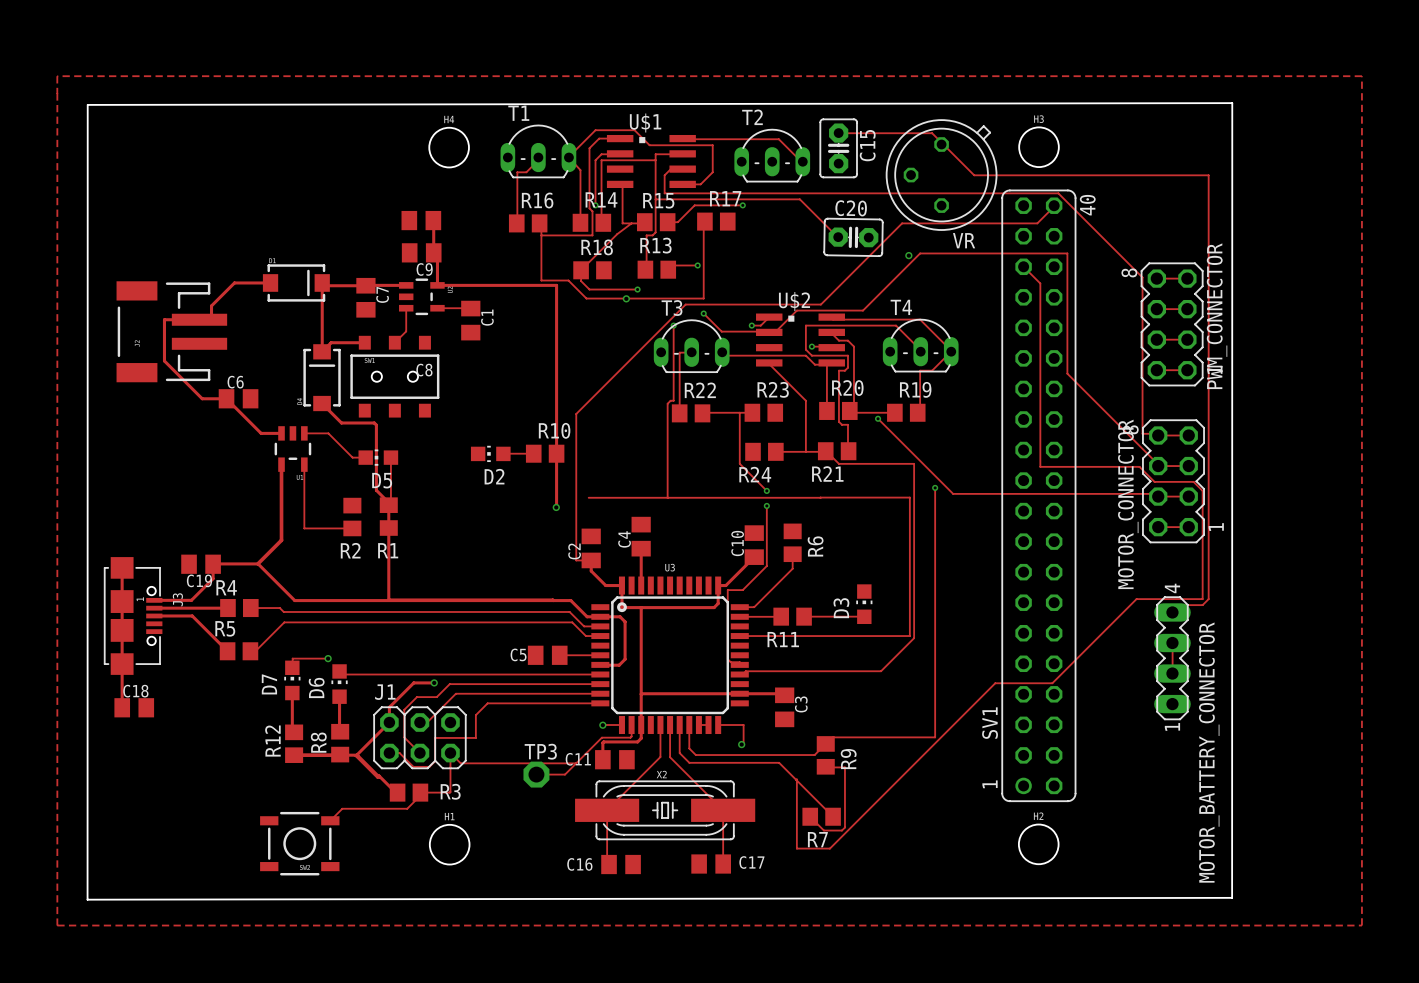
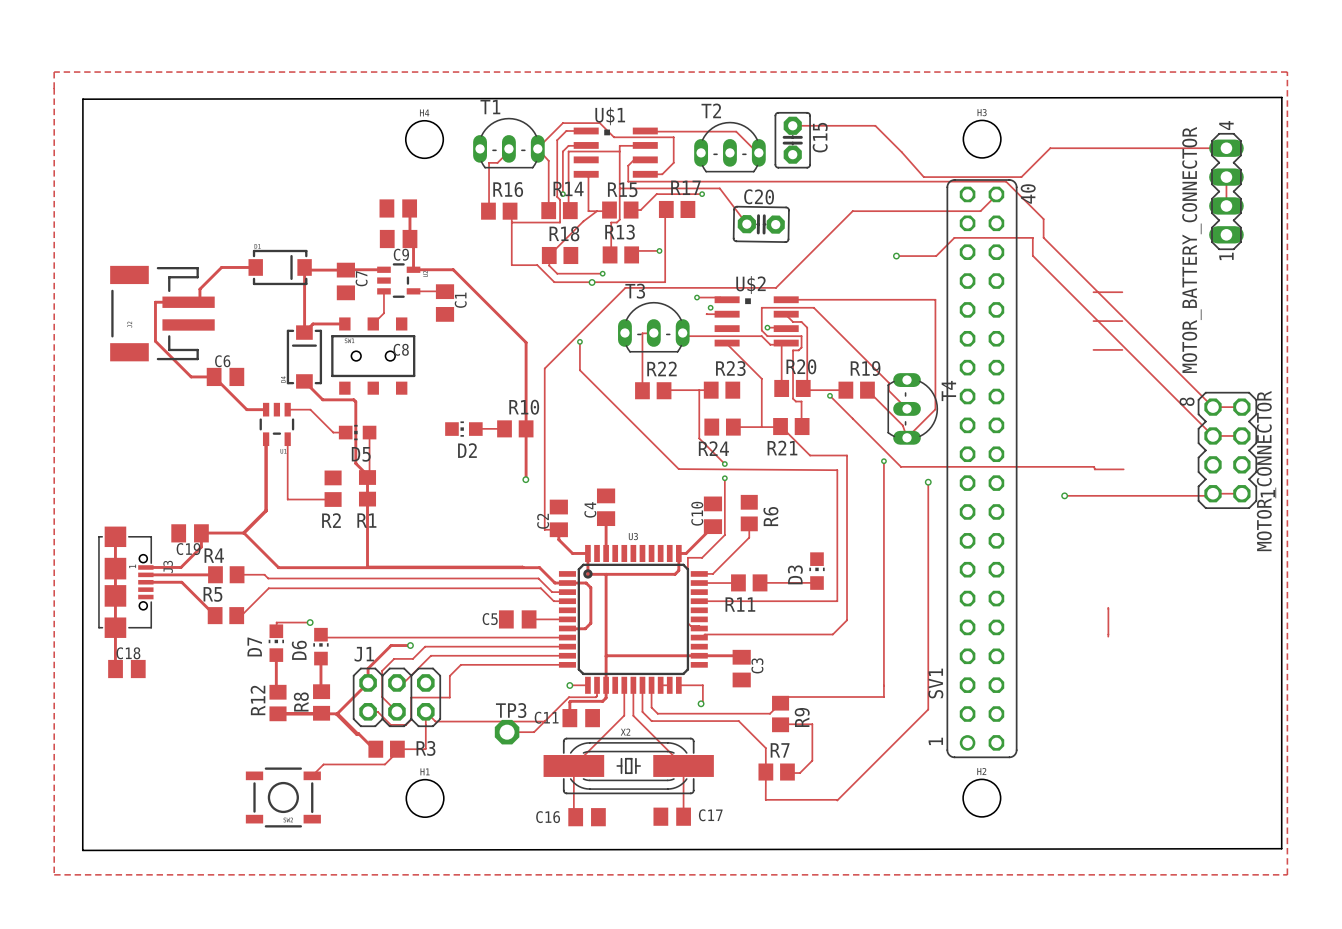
board edge: (87, 104) (1232, 103) (1232, 897) (87, 899) -> (82, 99) (1281, 97) (1281, 848) (82, 850)
track: (838, 133) (932, 133) (974, 175) (1208, 175) (1208, 599) (1202, 605) (1178, 605) (1172, 612) -> (792, 125) (875, 125) (923, 177) (1021, 177) (1050, 148) (1226, 148)
VR: (941, 175) -> none
track: none -> (1226, 177) (1226, 205)
track: (664, 192) (1058, 193) (1142, 277) (1142, 433) (1188, 435) -> (628, 181) (1006, 181) (1043, 219) (1043, 237) (1213, 407) (1241, 407)
track: (761, 199) (799, 199) (837, 236) -> (719, 188) (746, 223)
MOTOR_BATTERY_CONNECTOR: none -> (1226, 191)
C20 position: (853, 237) -> (761, 224)
via position: (908, 255) -> (896, 256)
track: (1023, 266) (1040, 283) (1040, 466) (1139, 466) (1154, 481) (1193, 481) (1202, 490) (1202, 599) (1136, 599) (1052, 683) (995, 683) (829, 848) (796, 848) (796, 780) -> none
track: none -> (896, 256) (936, 256) (954, 237) (1032, 237) (1032, 255) (1213, 435)
track: (1156, 278) (1187, 278) -> none
track: (479, 285) (556, 285) (556, 362) -> (453, 269) (526, 342)
track: (685, 304) (576, 413) -> (648, 287) (625, 287) (544, 368) (544, 391)
track: (703, 313) (721, 331) (766, 331) -> none
via: (703, 313) -> none
via: none -> (697, 297)
track: (831, 317) (832, 319) (920, 319) (950, 349) (951, 351) (932, 370) (920, 370) (920, 412) (917, 412) -> (786, 299) (935, 299) (935, 409) (907, 437) (902, 425) (867, 390)
track: (766, 319) (760, 325) (751, 325) -> (724, 302) (720, 297) (697, 297)
PWM_CONNECTOR: (1172, 324) -> none
track: (673, 325) (673, 400) (667, 403) (667, 497) -> none
via: (673, 325) -> none
track: (861, 325) (896, 325) (920, 351) -> (814, 307) (888, 382) (888, 390) (907, 408)
track: (769, 332) (775, 331) (796, 310) (863, 310) (920, 253) (1067, 253) (1067, 373) (1158, 466) (1188, 466) -> (727, 314) (706, 314)
T4 rotation: 0° (920, 345) -> 90° clockwise (912, 408)
T4 position: (920, 345) -> (912, 408)
via: none -> (579, 341)
track: (838, 463) (914, 463) (914, 638) (896, 656) -> (793, 438) (810, 455) (847, 455) (847, 620)
MOTOR_CONNECTOR position: (1173, 481) -> (1227, 450)
track: (588, 497) (820, 497) -> none
track: (820, 497) (909, 497) (909, 636) (885, 636) -> (579, 341) (579, 370) (678, 469) (837, 470) (837, 601)
MOTOR_CONNECTOR name position: MOTOR_CONNECTOR (1128, 504) -> MOTOR_CONNECTOR (1266, 471)
via: none -> (928, 482)
track: none -> (1241, 493) (1213, 493) (1212, 495) (1064, 495)
via: none -> (1064, 495)
track: (1158, 527) (1188, 527) -> (1213, 435) (1241, 435)
MOTOR_BATTERY_CONNECTOR: (1172, 658) -> none
track: (779, 762) (833, 816) -> (736, 721) (738, 721) (765, 748) (765, 799) (837, 800) (928, 709) (928, 482)
track: (825, 766) (844, 767) (844, 827) (841, 830) (823, 830) (810, 816) (808, 818) -> (780, 724) (812, 724) (812, 760) (799, 773) (787, 772)
R7 name position: R7 (817, 839) -> R7 (780, 750)

